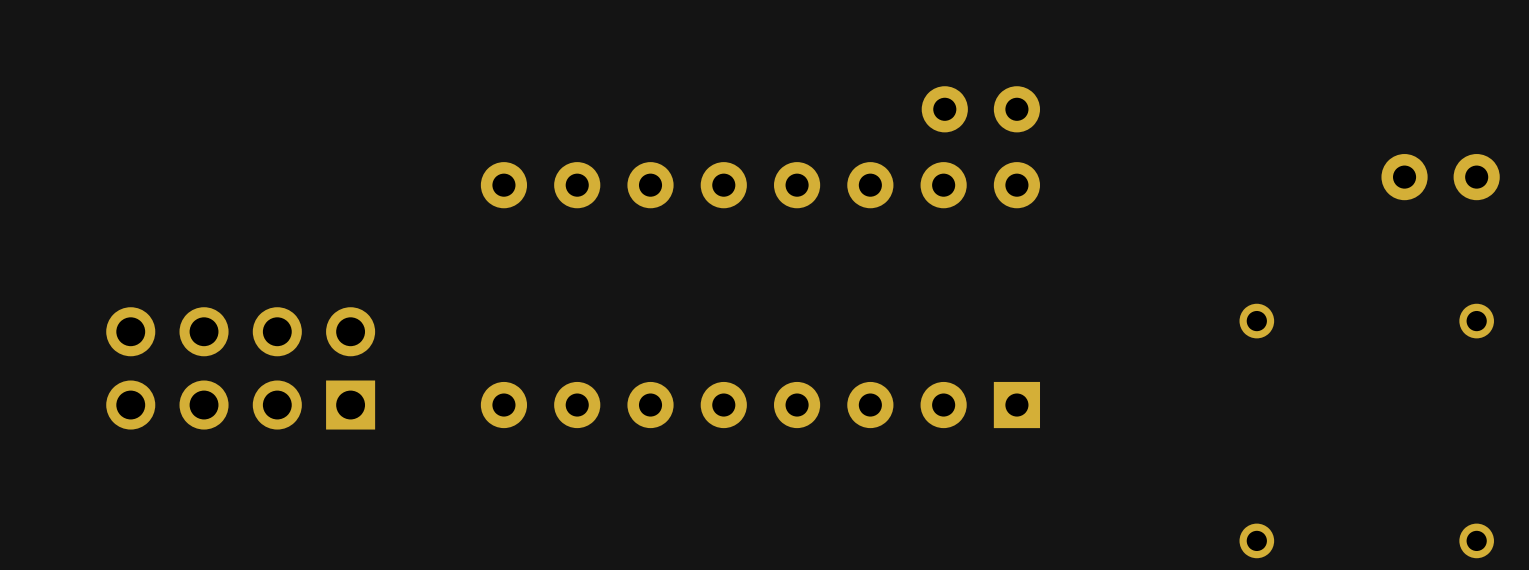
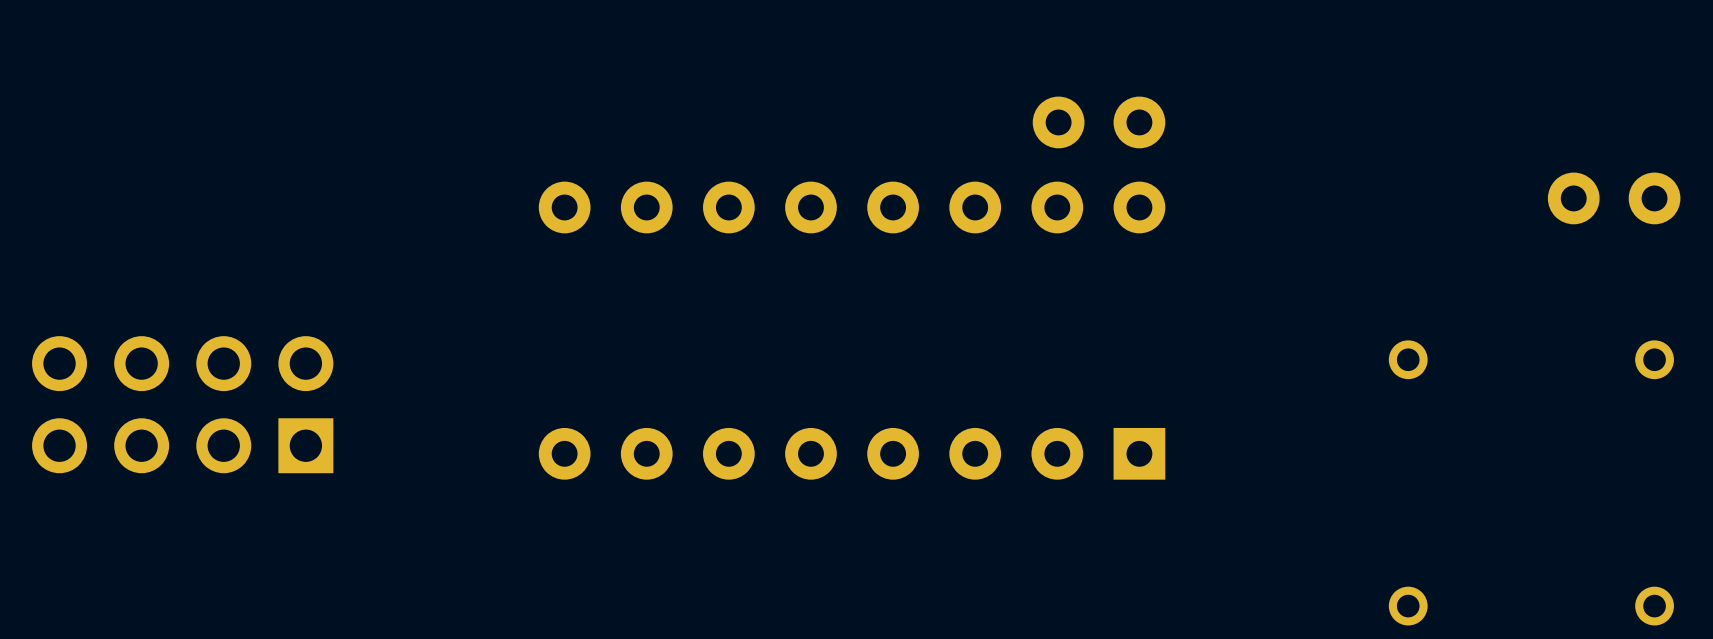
part position: (240, 368) -> (182, 404)

